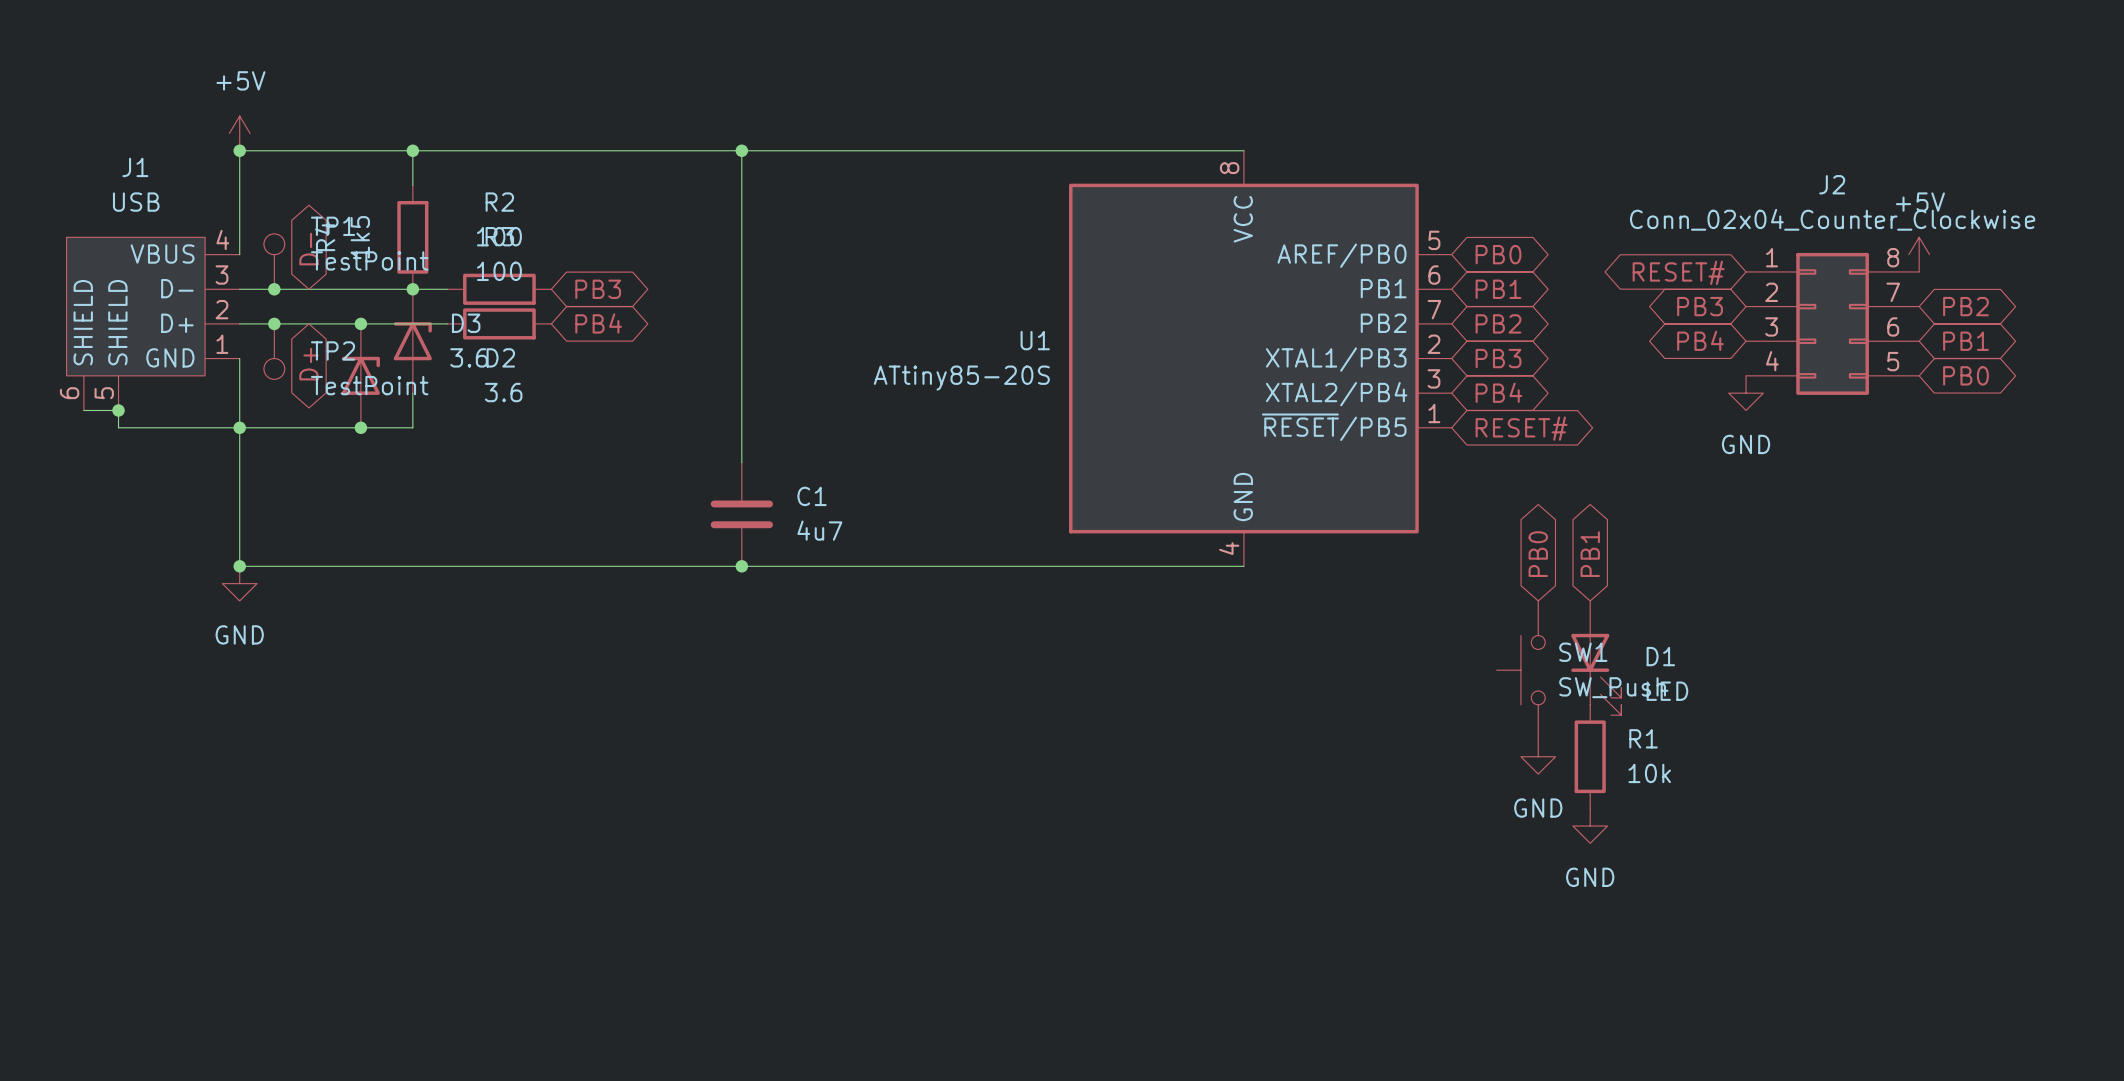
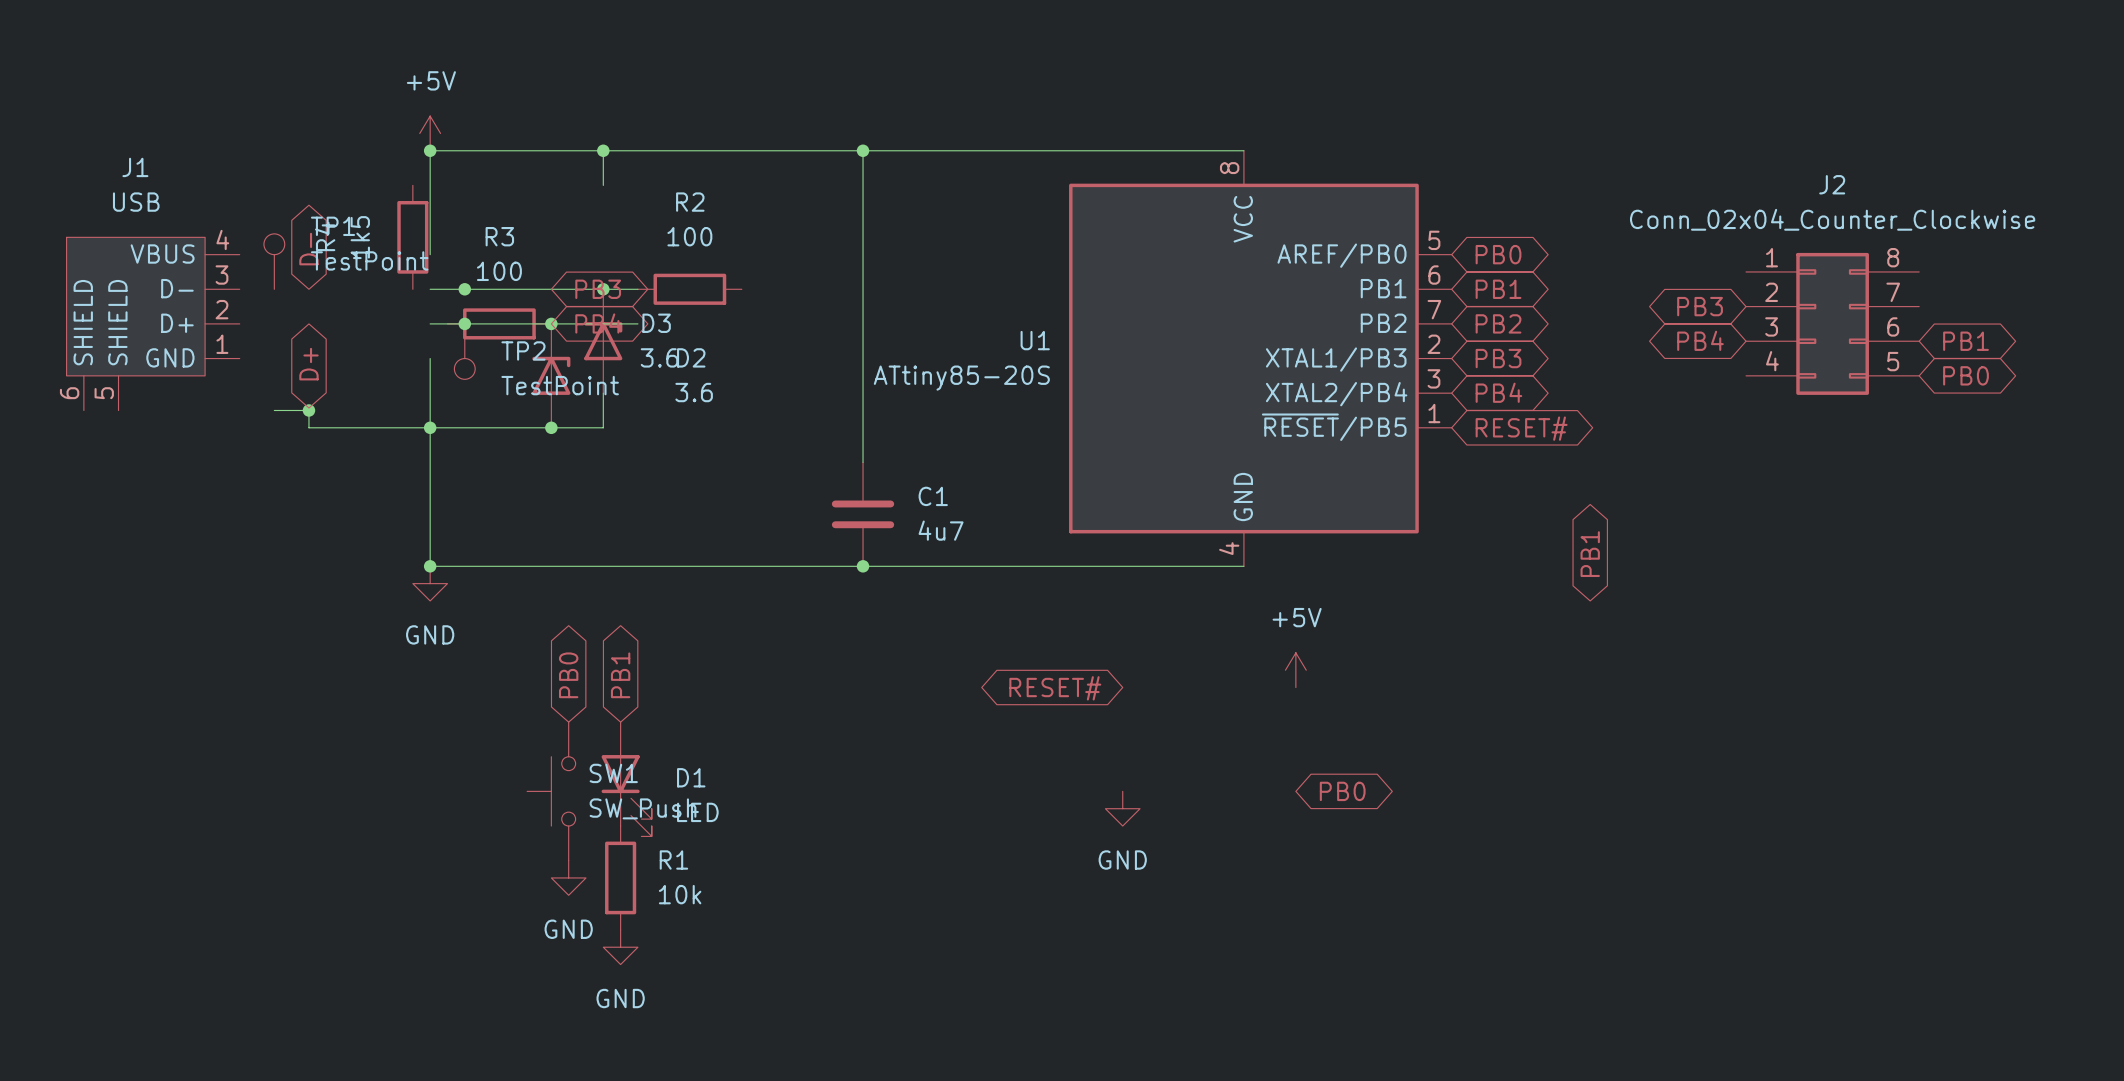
power symbol position: +5V (239, 133) -> +5V (430, 133)
junction: (239, 150) -> none
wire: (412, 150) (412, 185) -> (603, 150) (603, 185)
junction position: (412, 150) -> (430, 150)
wire: (430, 150) (239, 150) (239, 254) -> (430, 150) (430, 254)
junction: none -> (603, 150)
wire: (741, 150) (741, 462) -> (863, 150) (863, 462)
junction: (741, 150) -> none
junction: none -> (863, 150)
power symbol: +5V (1919, 254) -> none
global label: RESET# (1678, 272) -> none
wire: (239, 289) (430, 289) -> (447, 289) (637, 289)
junction: (274, 289) -> none
junction: (412, 289) -> none
junction: none -> (464, 289)
R2 position: (499, 289) -> (689, 289)
junction: none -> (603, 289)
global label: PB2 (1965, 306) -> none
wire: (239, 323) (430, 323) -> (447, 323) (637, 323)
junction: (274, 323) -> none
junction: (360, 323) -> none
junction: none -> (464, 323)
junction: none -> (551, 323)
D3 position: (412, 341) -> (603, 341)
TP2 position: (274, 351) -> (464, 351)
wire: (239, 358) (239, 566) (430, 566) -> (430, 358) (430, 566)
D2 position: (360, 375) -> (551, 375)
wire: (412, 393) (412, 427) -> (603, 393) (603, 427) (412, 427)
power symbol: GND (1746, 393) -> none
wire: (83, 410) (118, 410) (118, 427) (308, 427) -> (274, 410) (308, 410) (308, 427)
junction: (118, 410) -> none
junction: none -> (308, 410)
junction: (239, 427) -> none
junction: (360, 427) -> none
junction: none -> (430, 427)
junction: none -> (551, 427)
C1 position: (741, 514) -> (863, 514)
global label rotation: 0° (1538, 554) -> 90° clockwise (1342, 791)
global label position: PB0 (1538, 554) -> PB0 (1342, 791)
junction: (239, 566) -> none
junction: none -> (430, 566)
junction: (741, 566) -> none
junction: none -> (863, 566)
power symbol position: GND (239, 583) -> GND (430, 583)
D1 position: (1596, 658) -> (626, 779)
power symbol: none -> +5V (1295, 670)
SW1 position: (1520, 670) -> (551, 791)
global label: none -> PB0 (568, 675)
global label: none -> PB1 (620, 675)
global label: none -> RESET# (1055, 688)
power symbol: GND (1538, 756) -> none
R1 position: (1590, 756) -> (620, 877)
power symbol: none -> GND (1122, 808)
power symbol: GND (1590, 826) -> none
power symbol: none -> GND (568, 877)
power symbol: none -> GND (620, 947)

